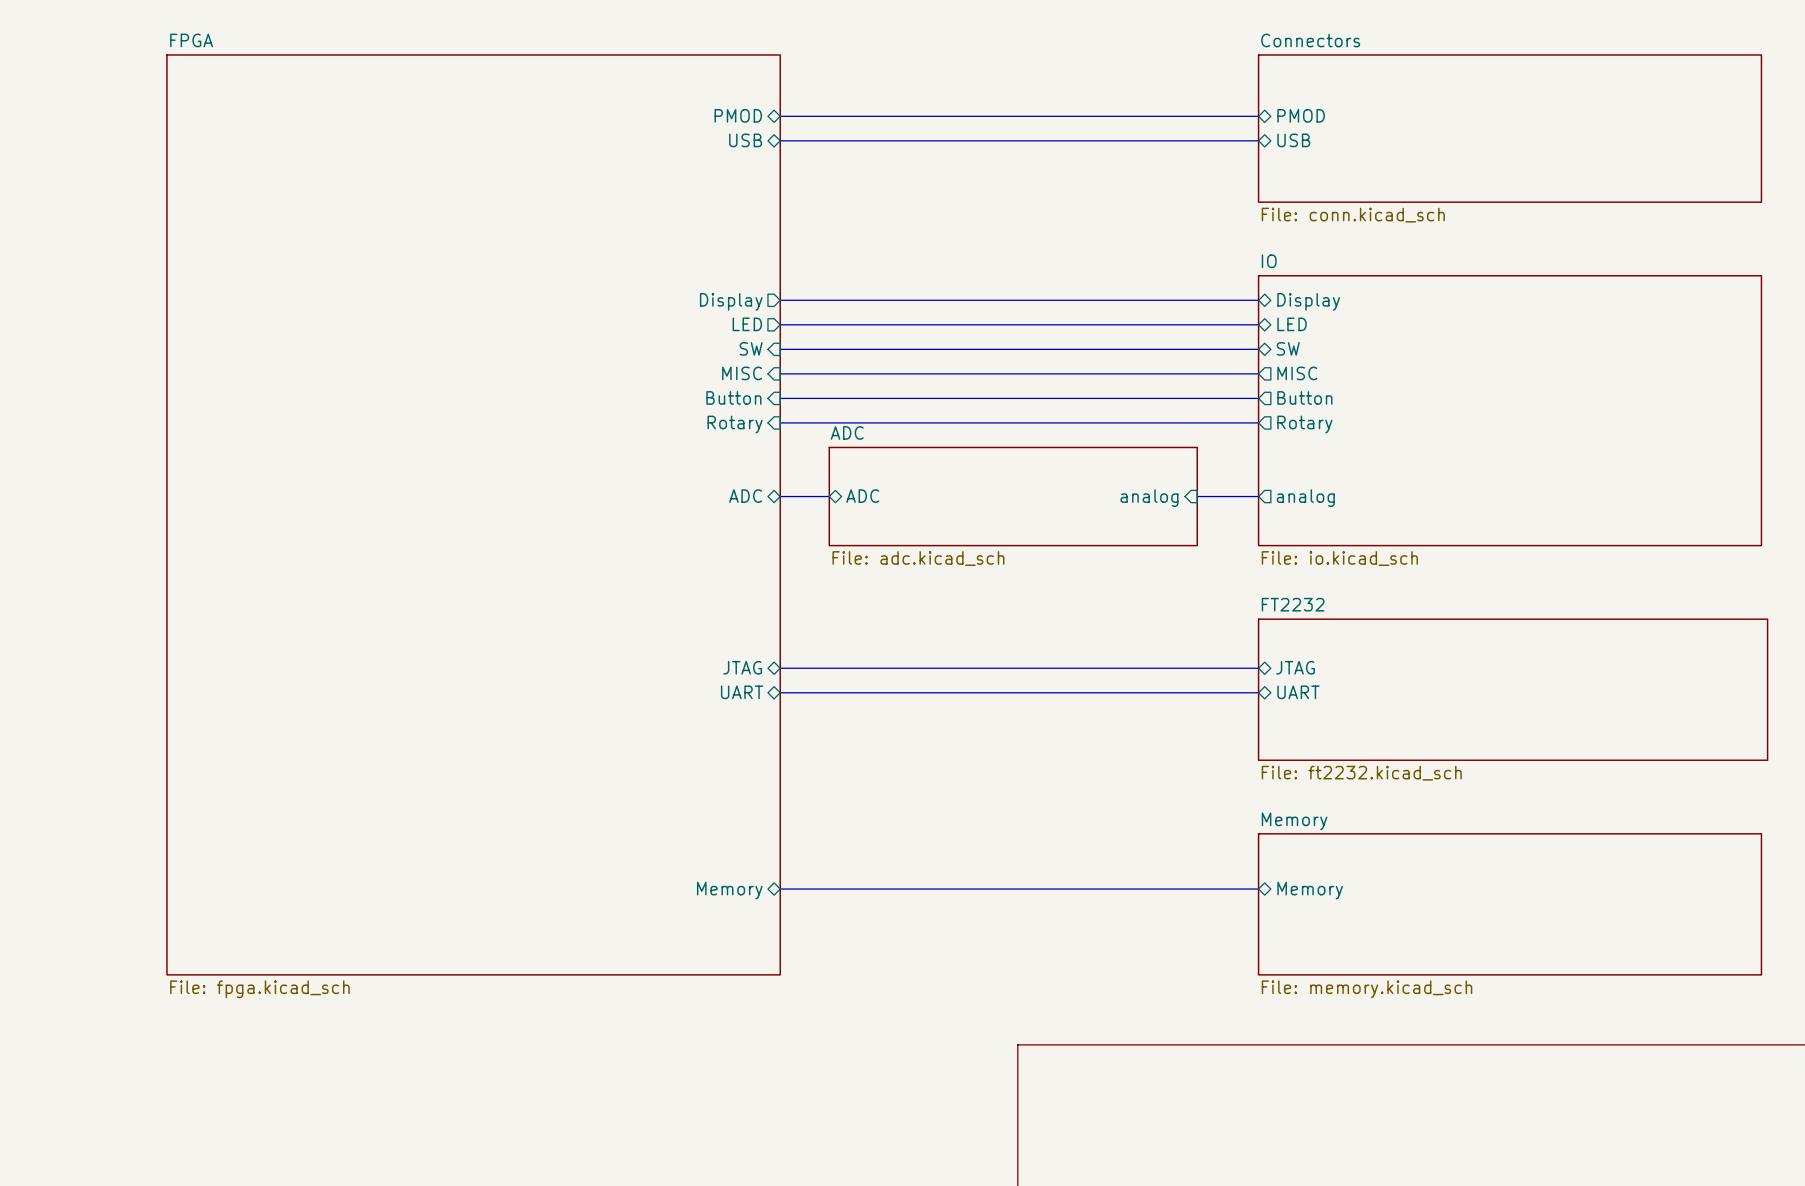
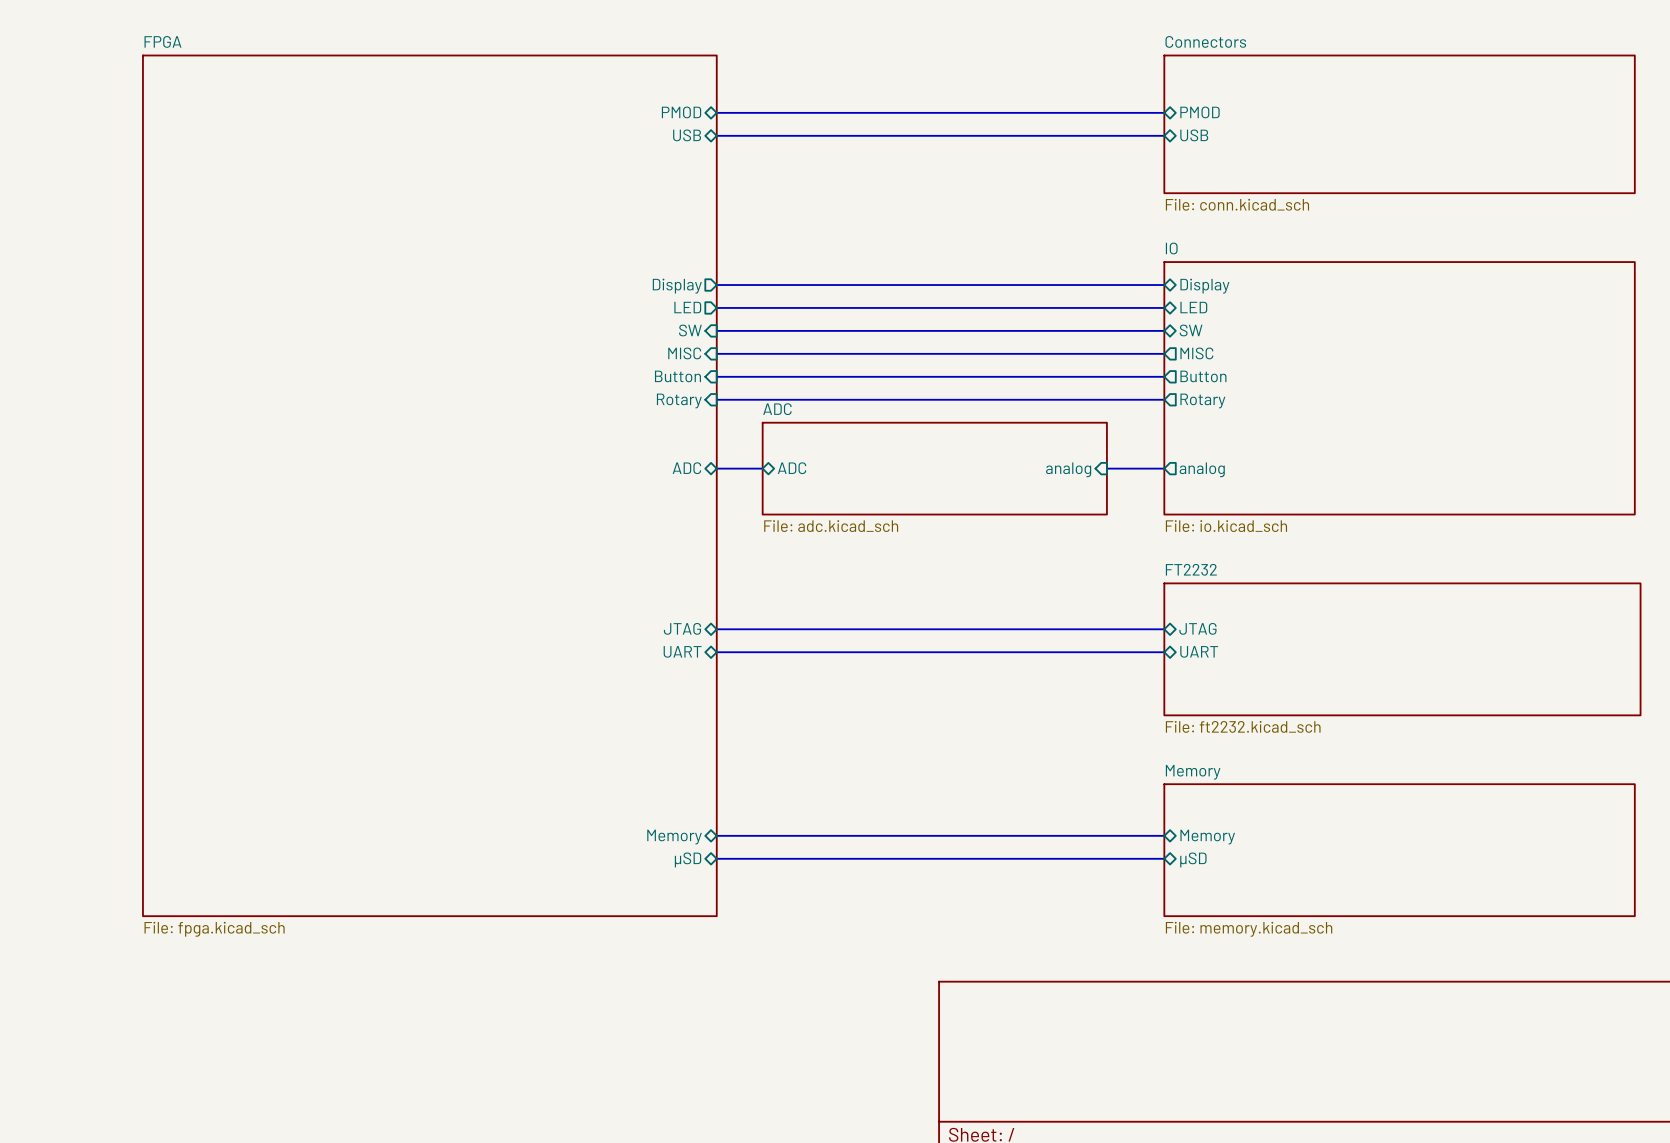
bus: none -> (716, 858) (1164, 858)
sheet pin: none -> μSD (688, 859)
sheet pin: none -> μSD (1193, 859)

